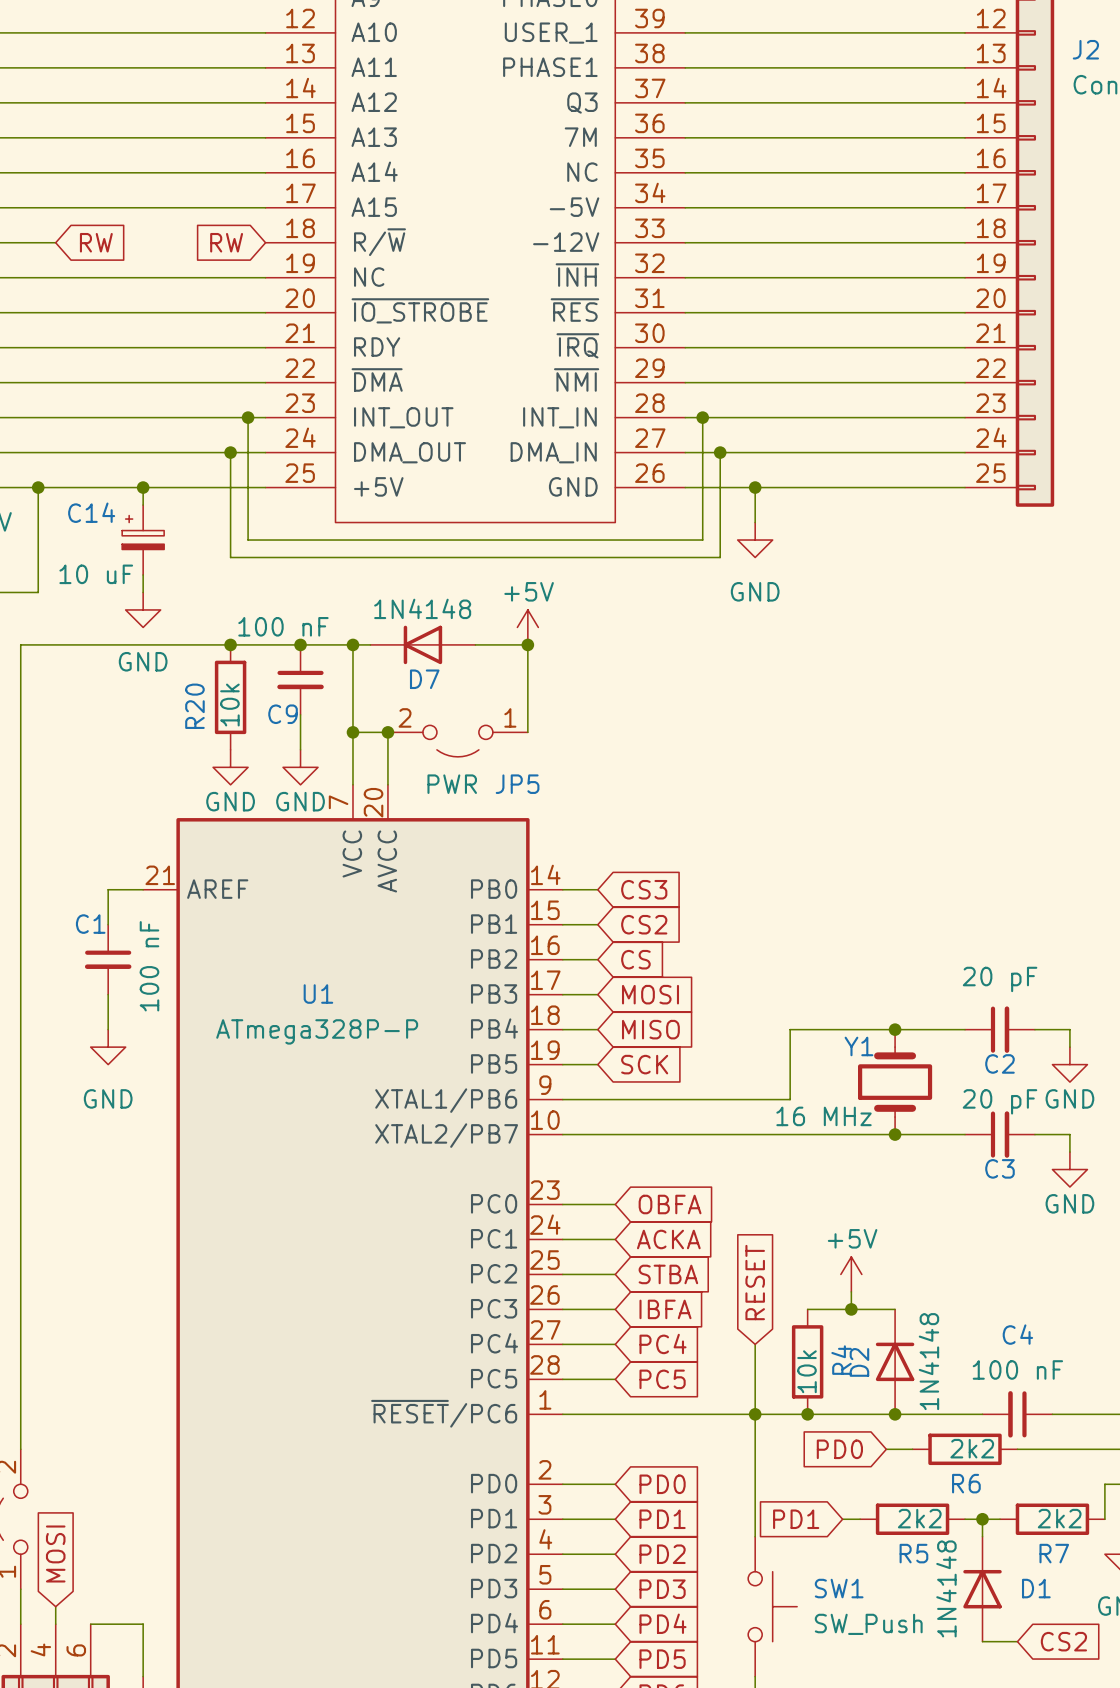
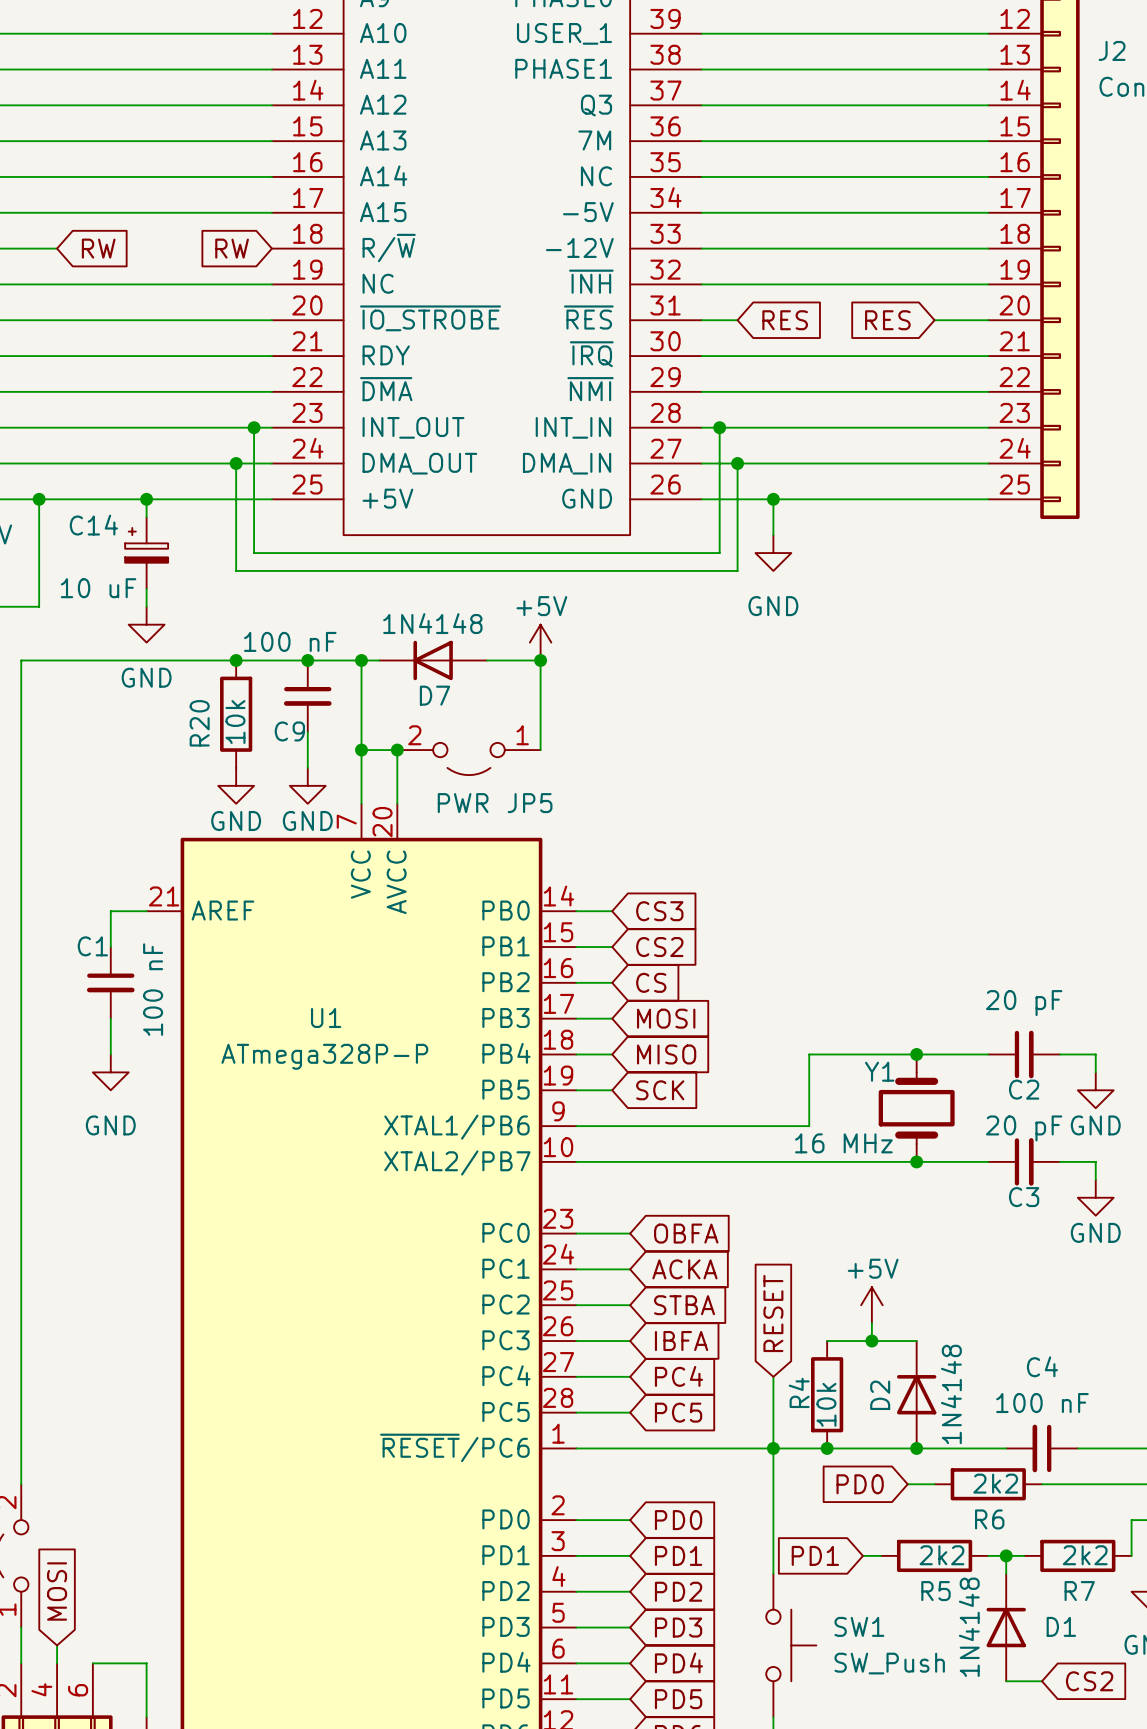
wire: (720, 312) (912, 312) -> none
global label: none -> RES (785, 320)
global label: none -> RES (887, 320)
R4 name position: R4 (841, 1360) -> R4 (799, 1392)

